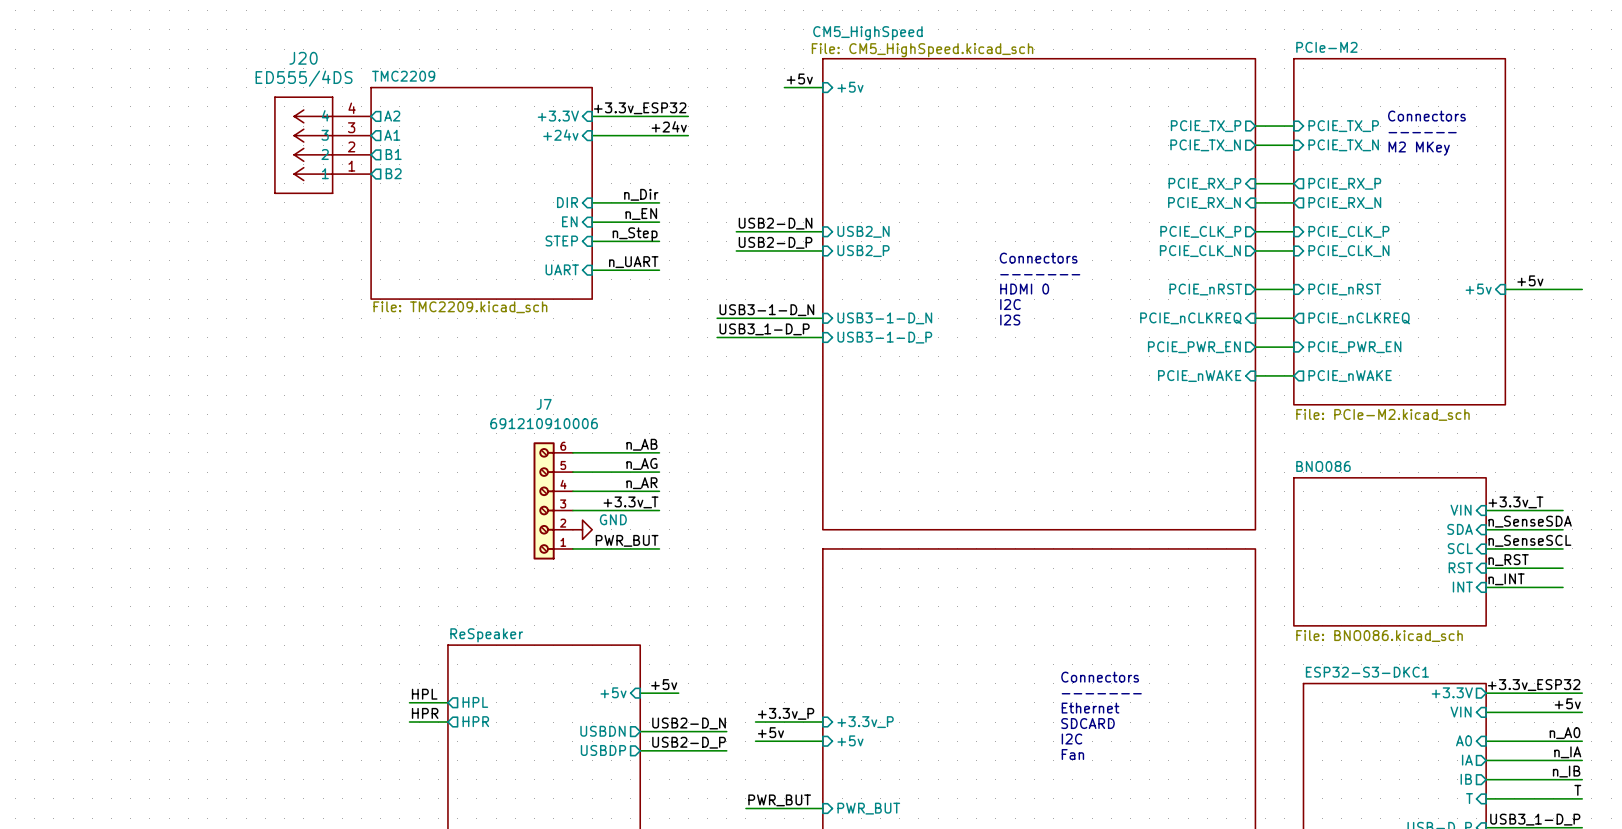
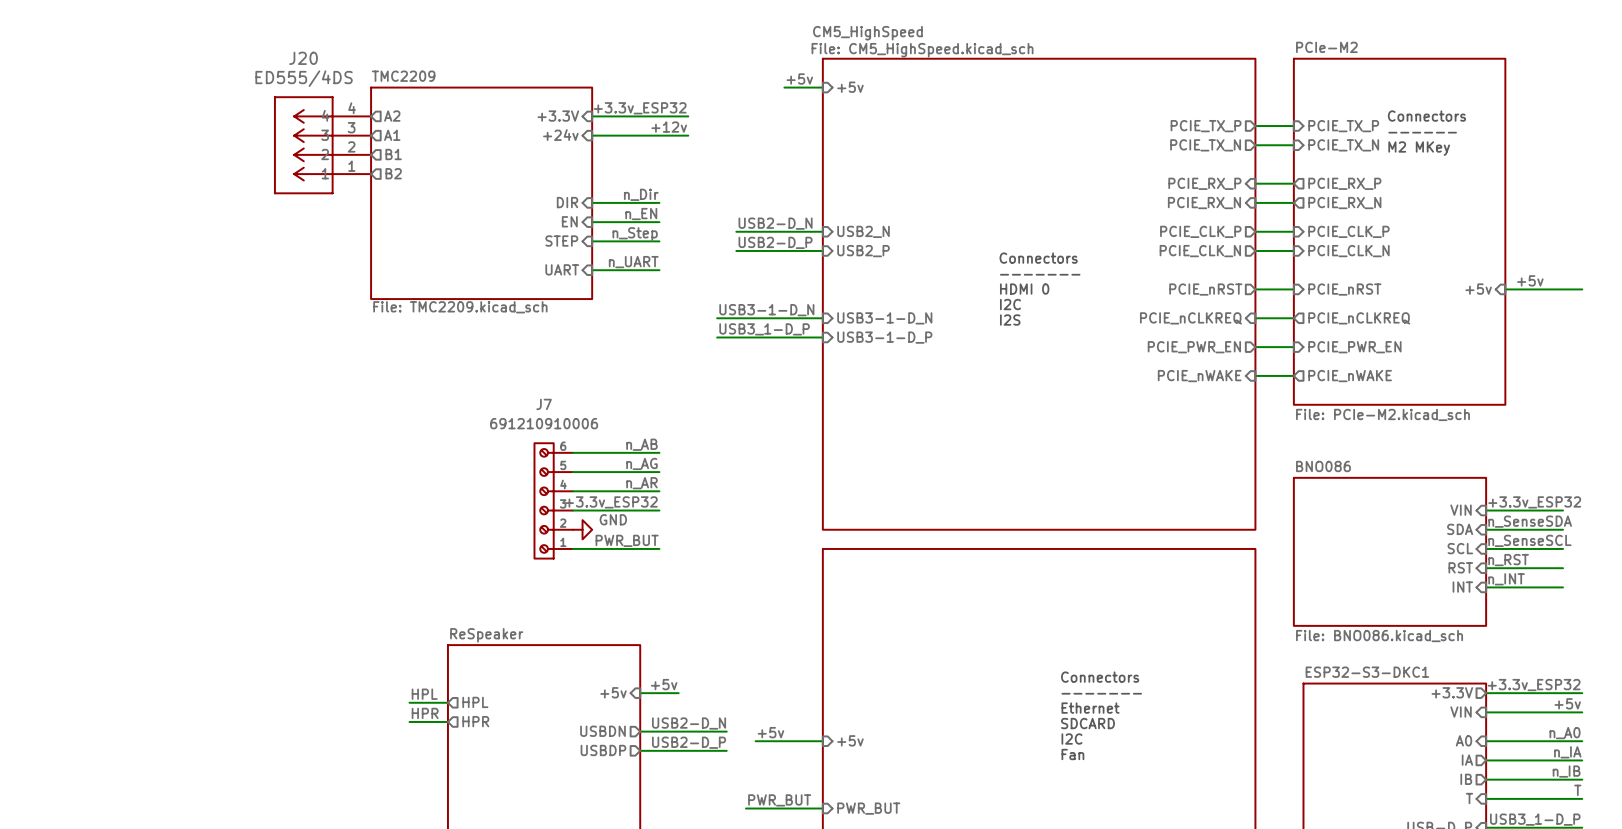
label: +24v (669, 126) -> +12v (669, 127)
label: +3.3v_T (630, 502) -> +3.3v_ESP32 (611, 502)
label: +3.3v_T (1515, 502) -> +3.3v_ESP32 (1534, 502)
label: +3.3v_P (786, 713) -> none
wire: (755, 722) (822, 722) -> none
sheet pin: +3.3v_P (865, 722) -> none

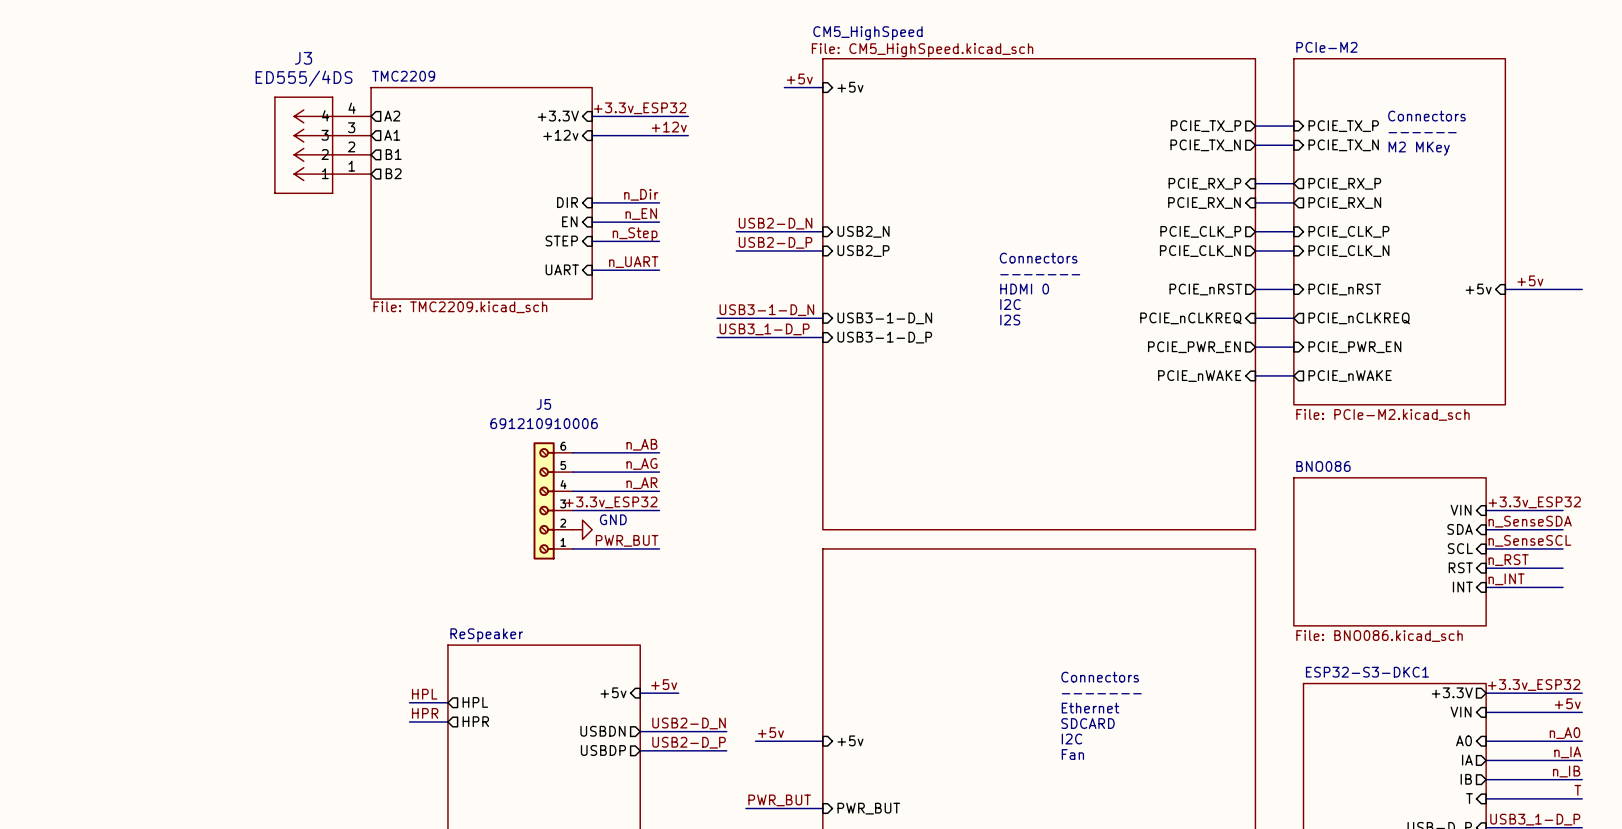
J20 name: J20 (303, 58) -> J3 (303, 58)
sheet pin: +24v (560, 135) -> +12v (560, 135)
J7 name: J7 (544, 404) -> J5 (543, 404)

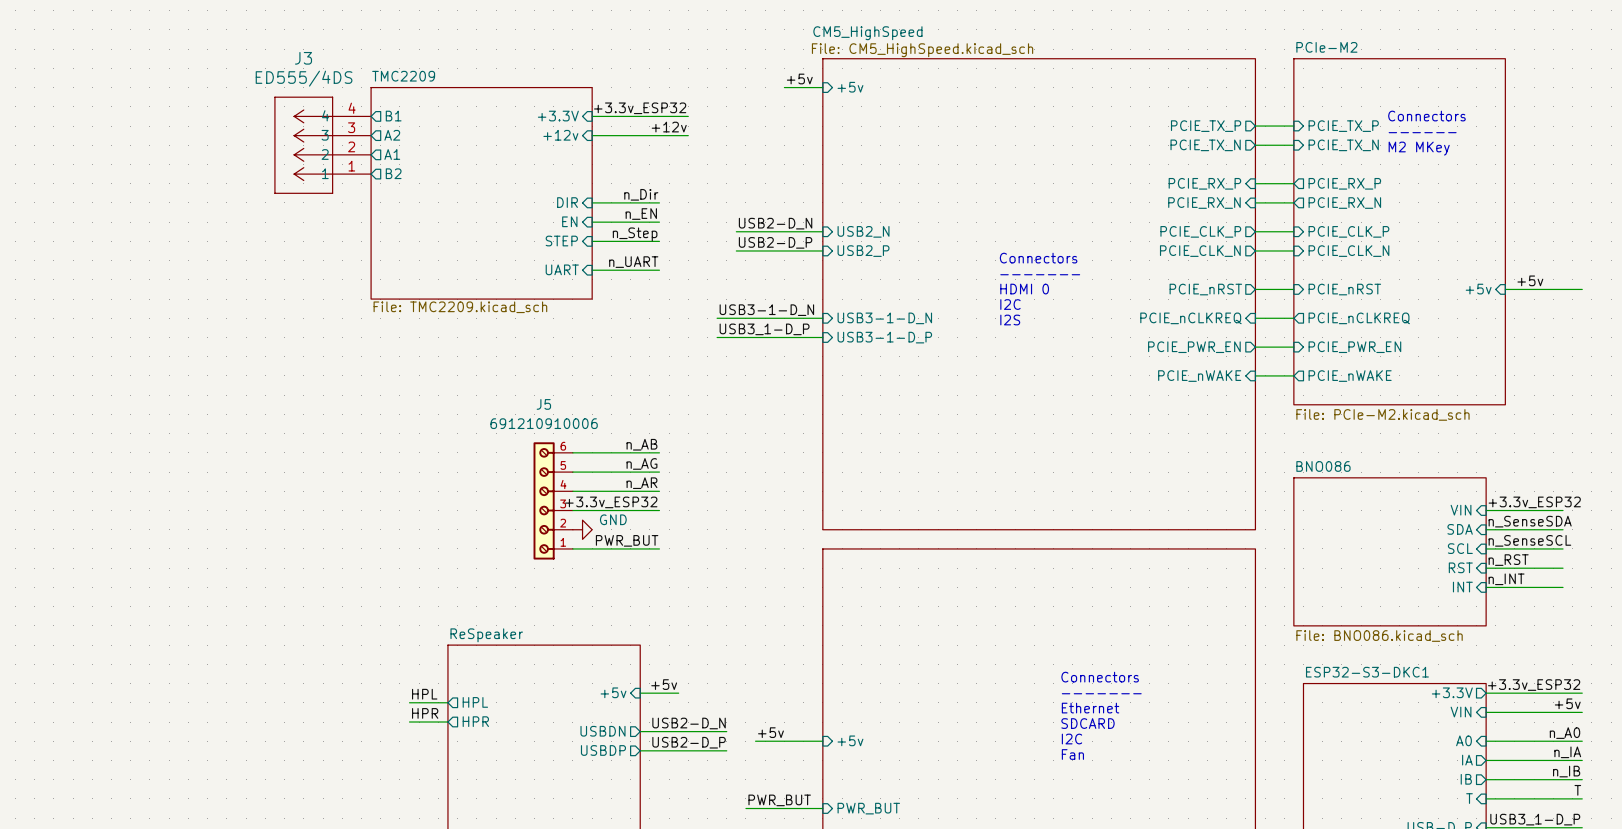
sheet pin: A2 (392, 116) -> B1 (393, 116)
sheet pin: A1 (392, 135) -> A2 (392, 135)
sheet pin: B1 (393, 154) -> A1 (392, 154)

